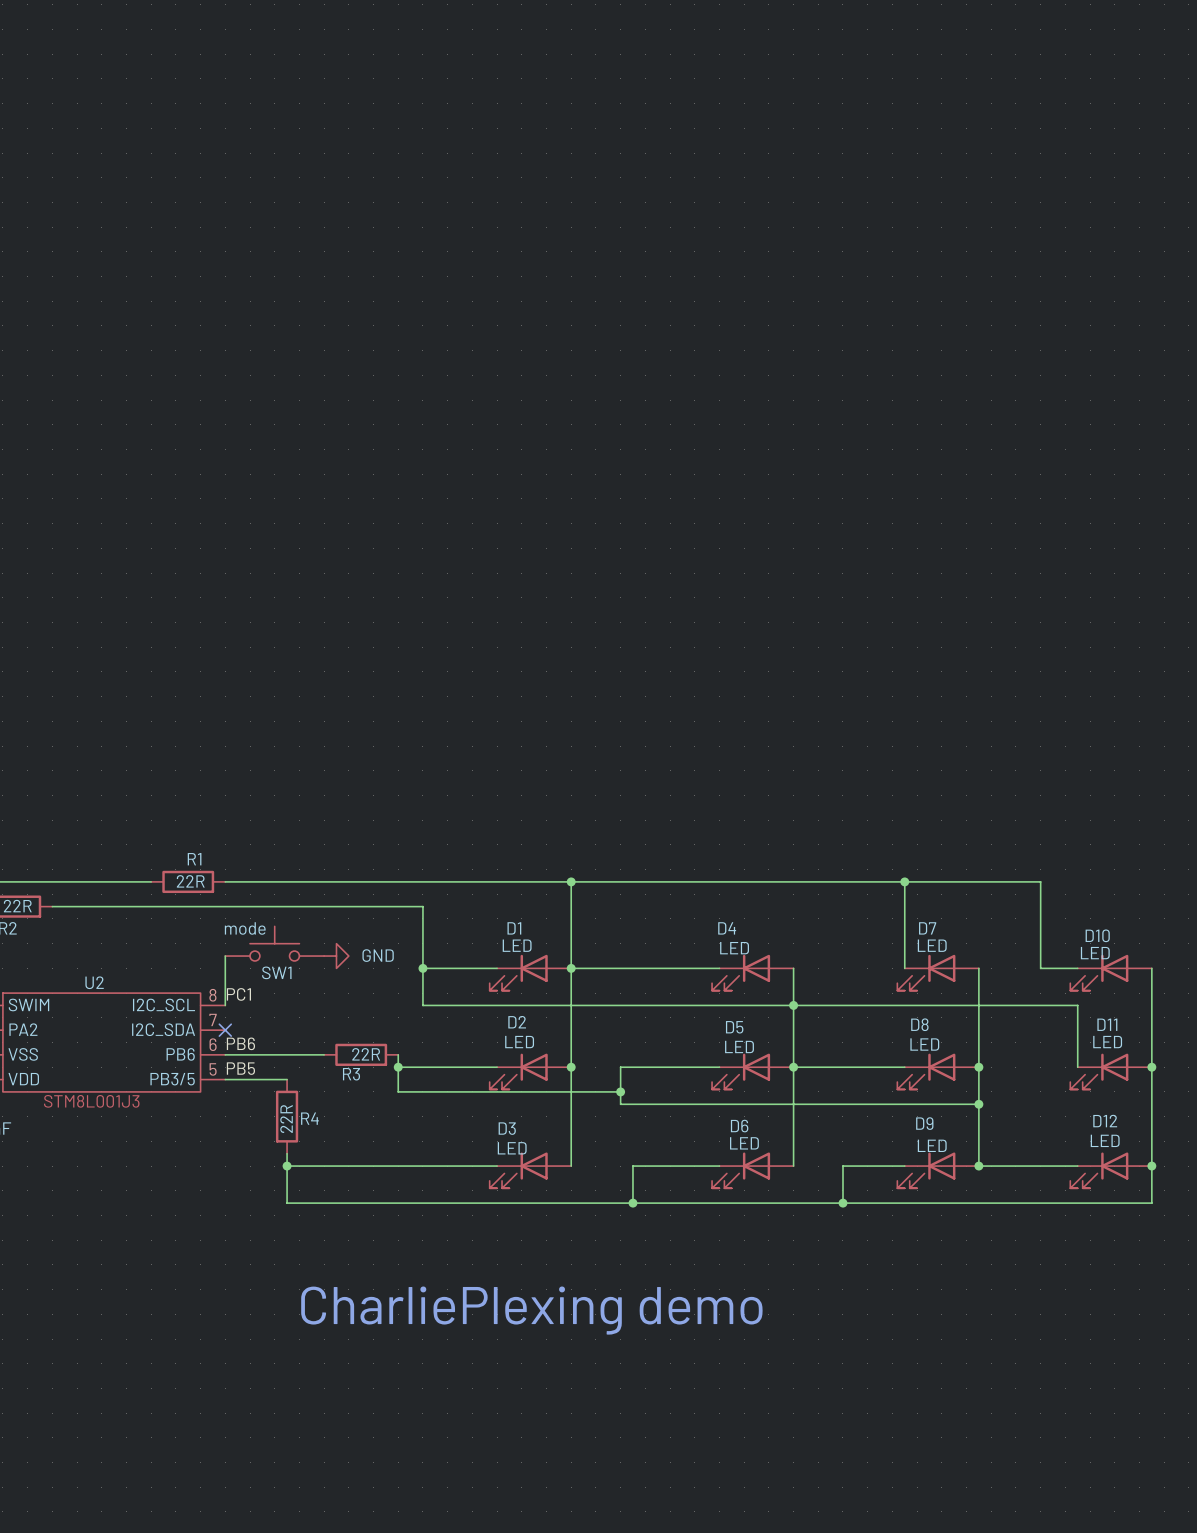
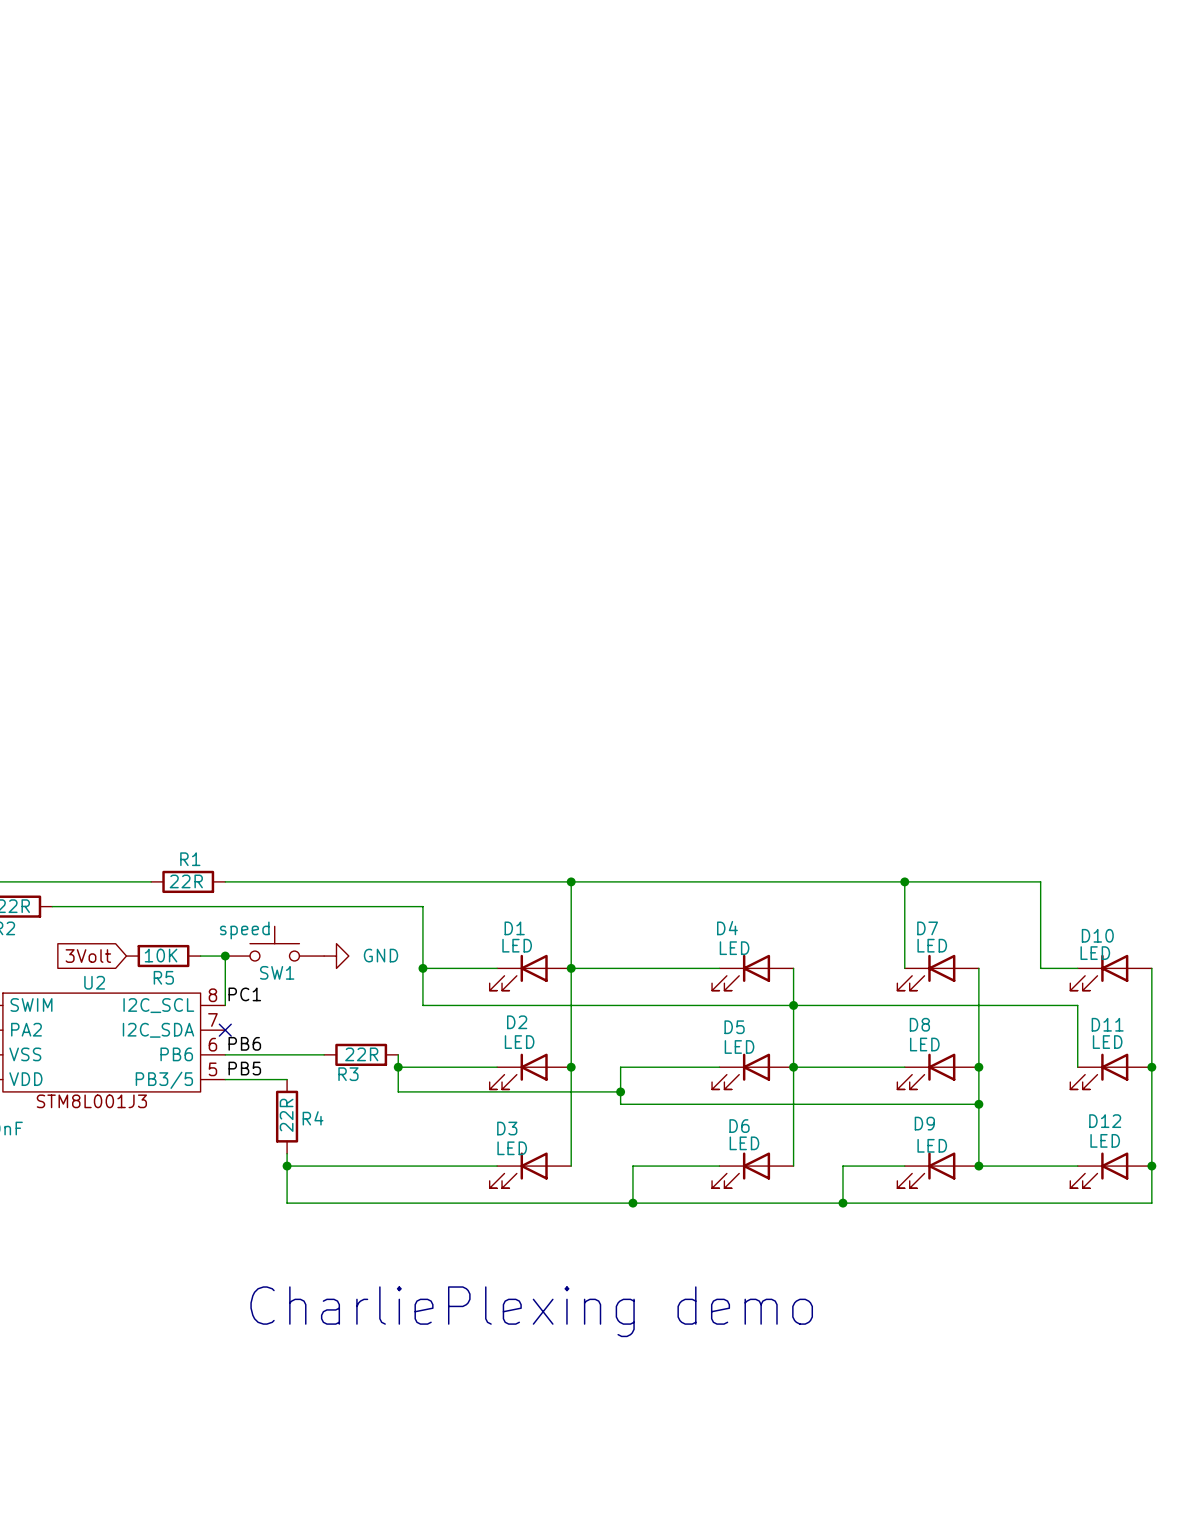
SW1 value: mode (245, 928) -> speed (244, 930)
global label: none -> 3Volt (88, 956)
R5: none -> 10K (163, 956)
wire: none -> (200, 956) (225, 956)
junction: none -> (225, 956)

